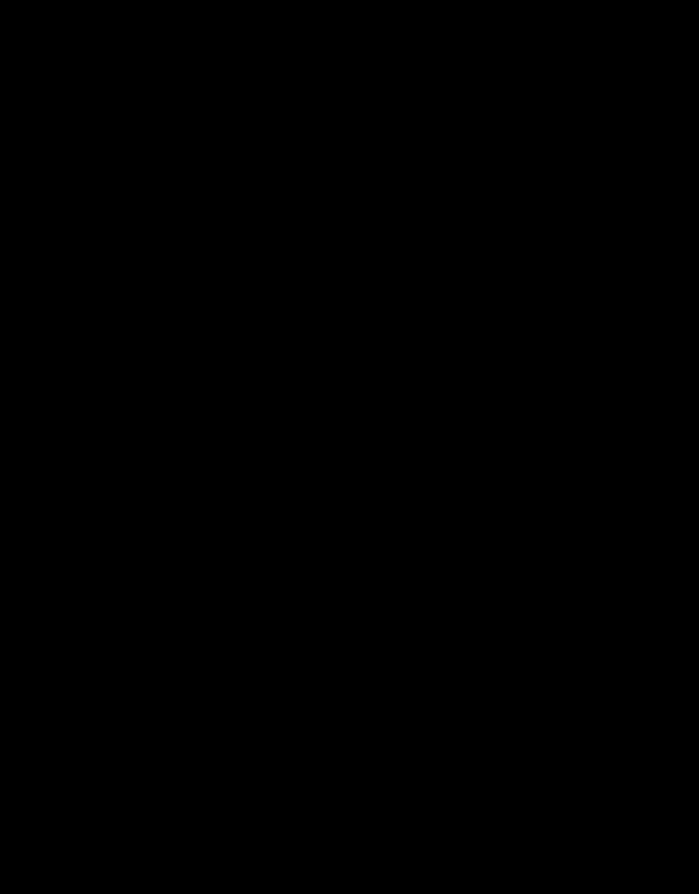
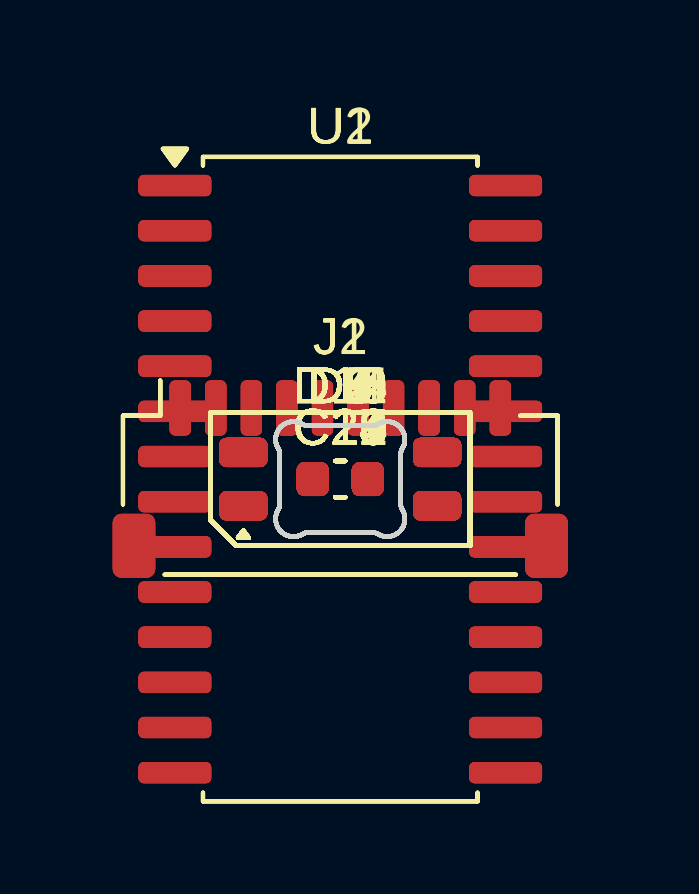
part: none -> (340, 475)
part: none -> (340, 475)
part: none -> (340, 478)
part: none -> (340, 478)
part: none -> (340, 479)
part: none -> (340, 479)
part: none -> (340, 479)
part: none -> (340, 479)
part: none -> (340, 479)
part: none -> (340, 479)
part: none -> (340, 479)
part: none -> (340, 479)
part: none -> (340, 479)
part: none -> (340, 479)
part: none -> (340, 479)
part: none -> (340, 479)
part: none -> (340, 479)
part: none -> (340, 479)
part: none -> (340, 479)
part: none -> (340, 479)
part: none -> (340, 479)
part: none -> (340, 479)
part: none -> (340, 479)
part: none -> (340, 479)
part: none -> (340, 479)
part: none -> (340, 479)
part: none -> (340, 479)
part: none -> (340, 479)
part: none -> (340, 479)
part: none -> (340, 479)
part: none -> (340, 479)
part: none -> (340, 479)
part: none -> (340, 479)
part: none -> (340, 479)

